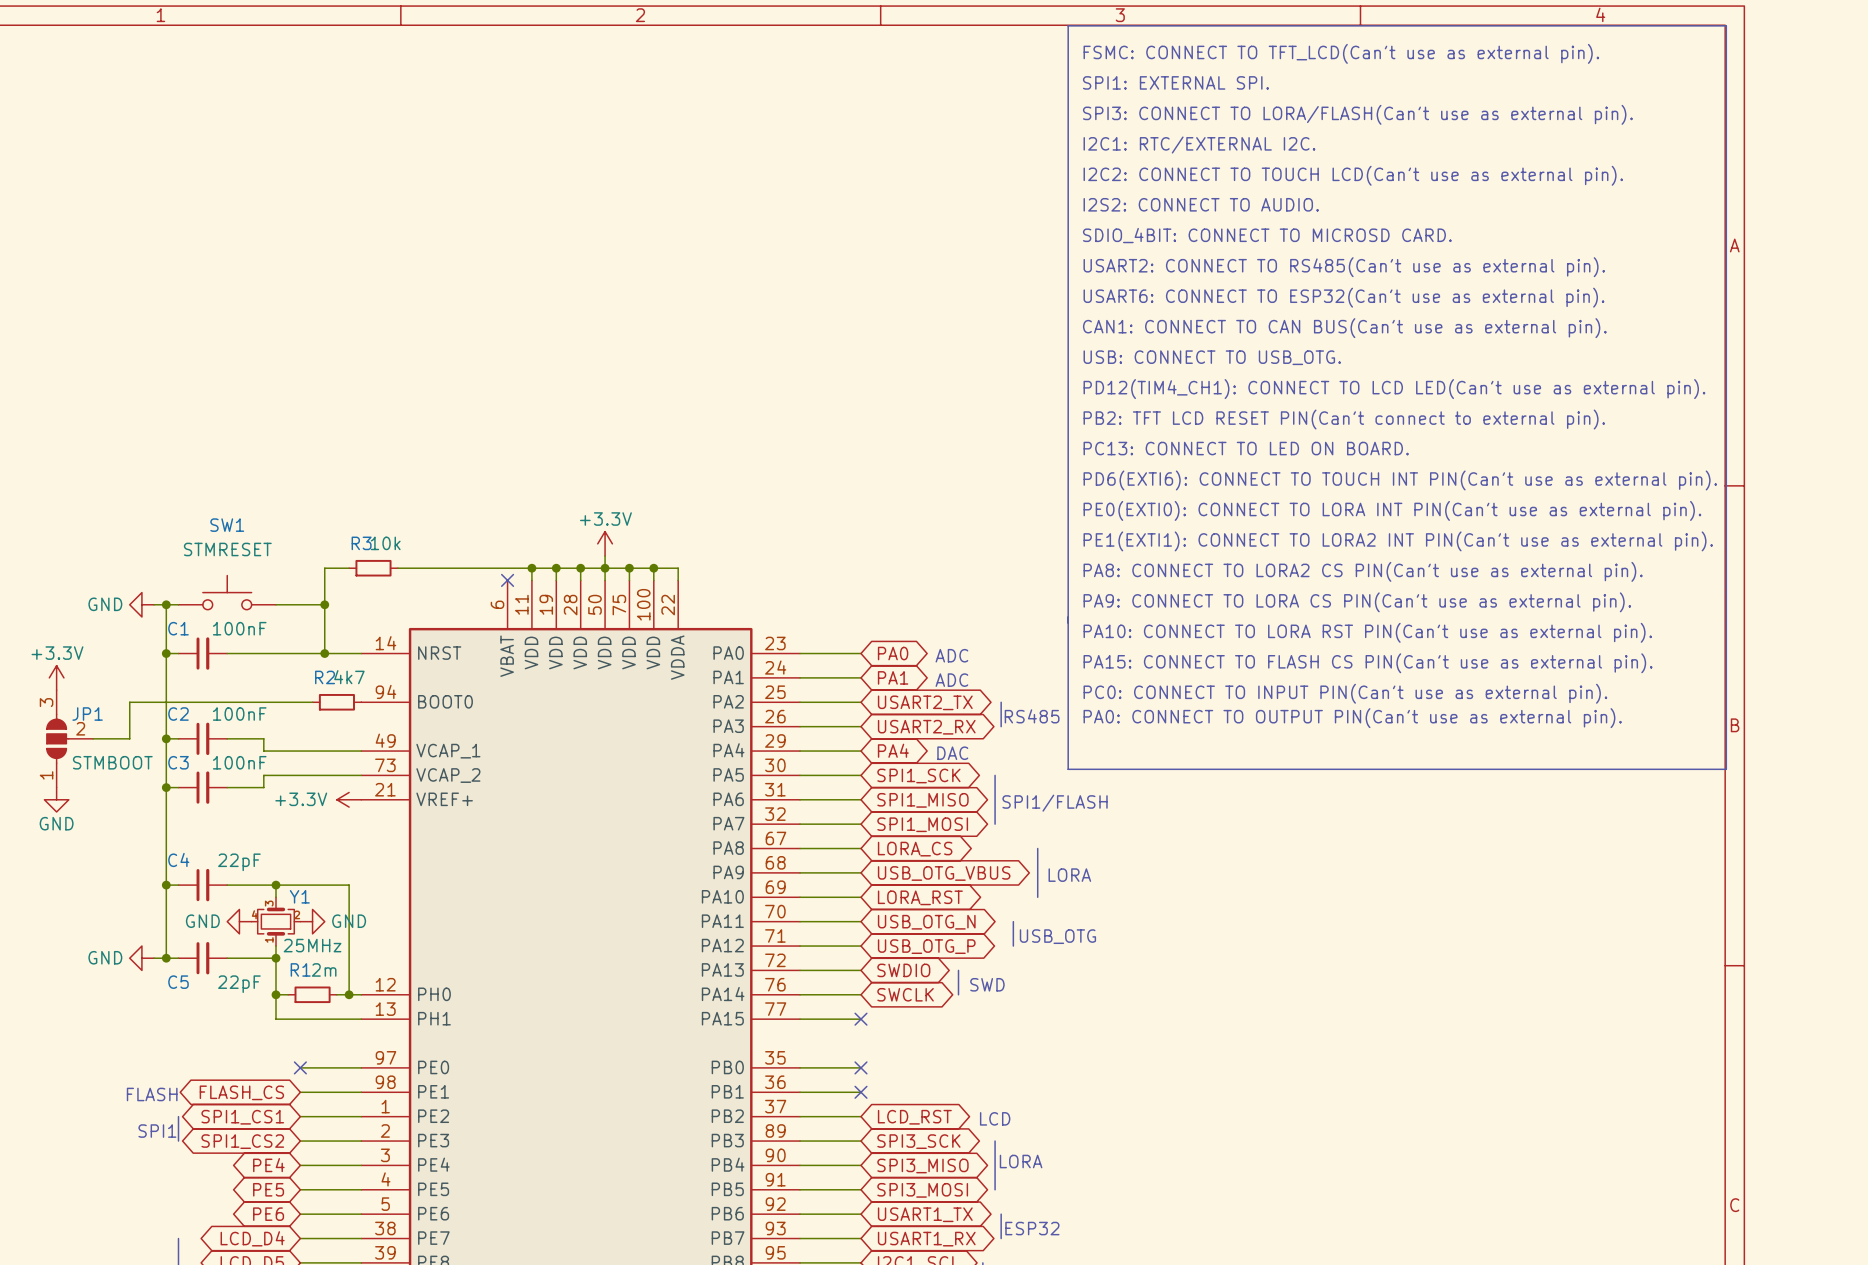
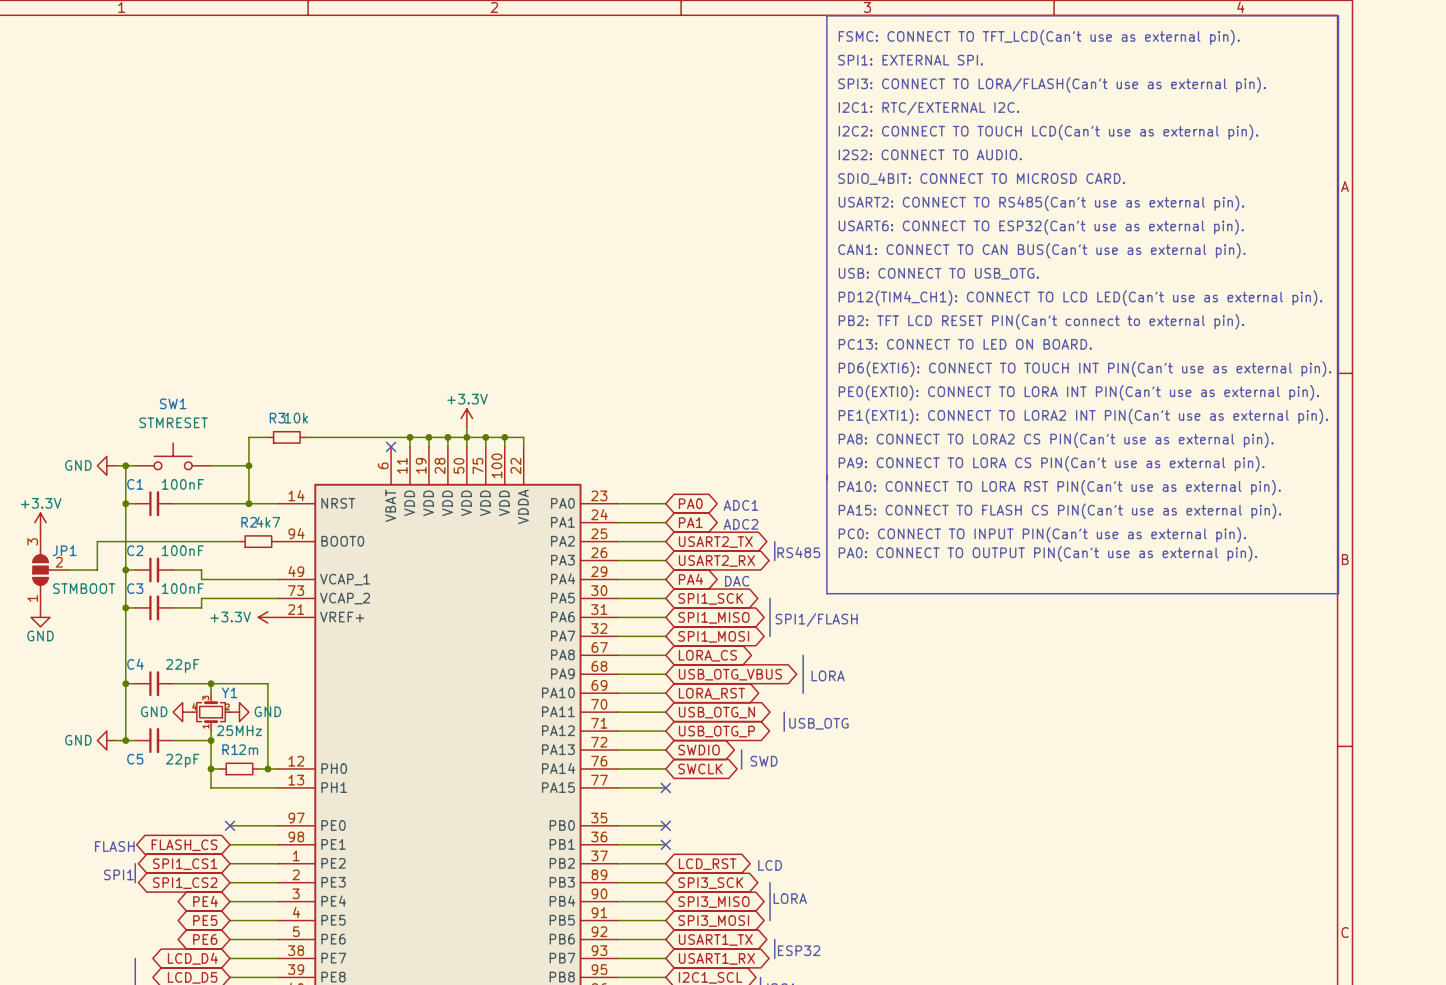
text: ADC (951, 655) -> ADC1 (740, 505)
text: ADC (951, 680) -> ADC2 (740, 524)

